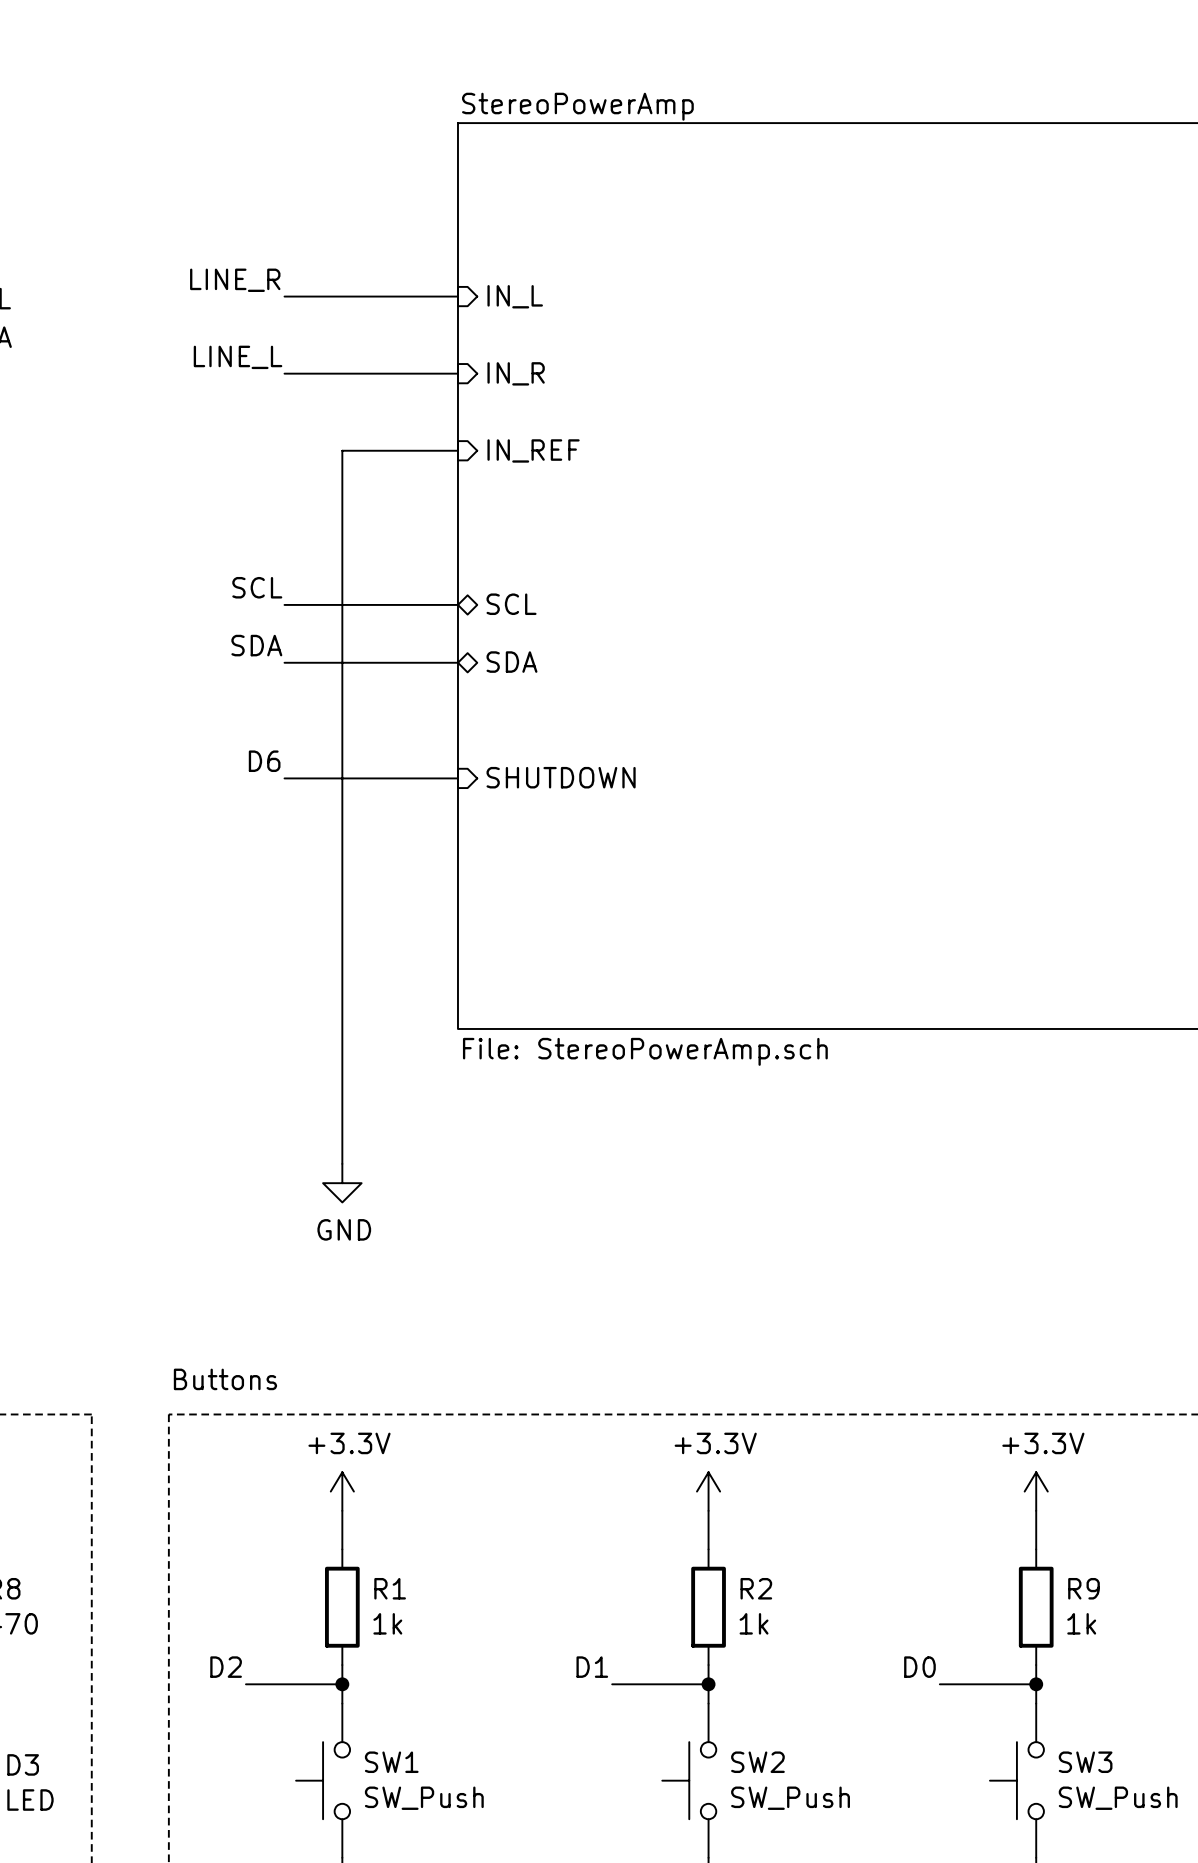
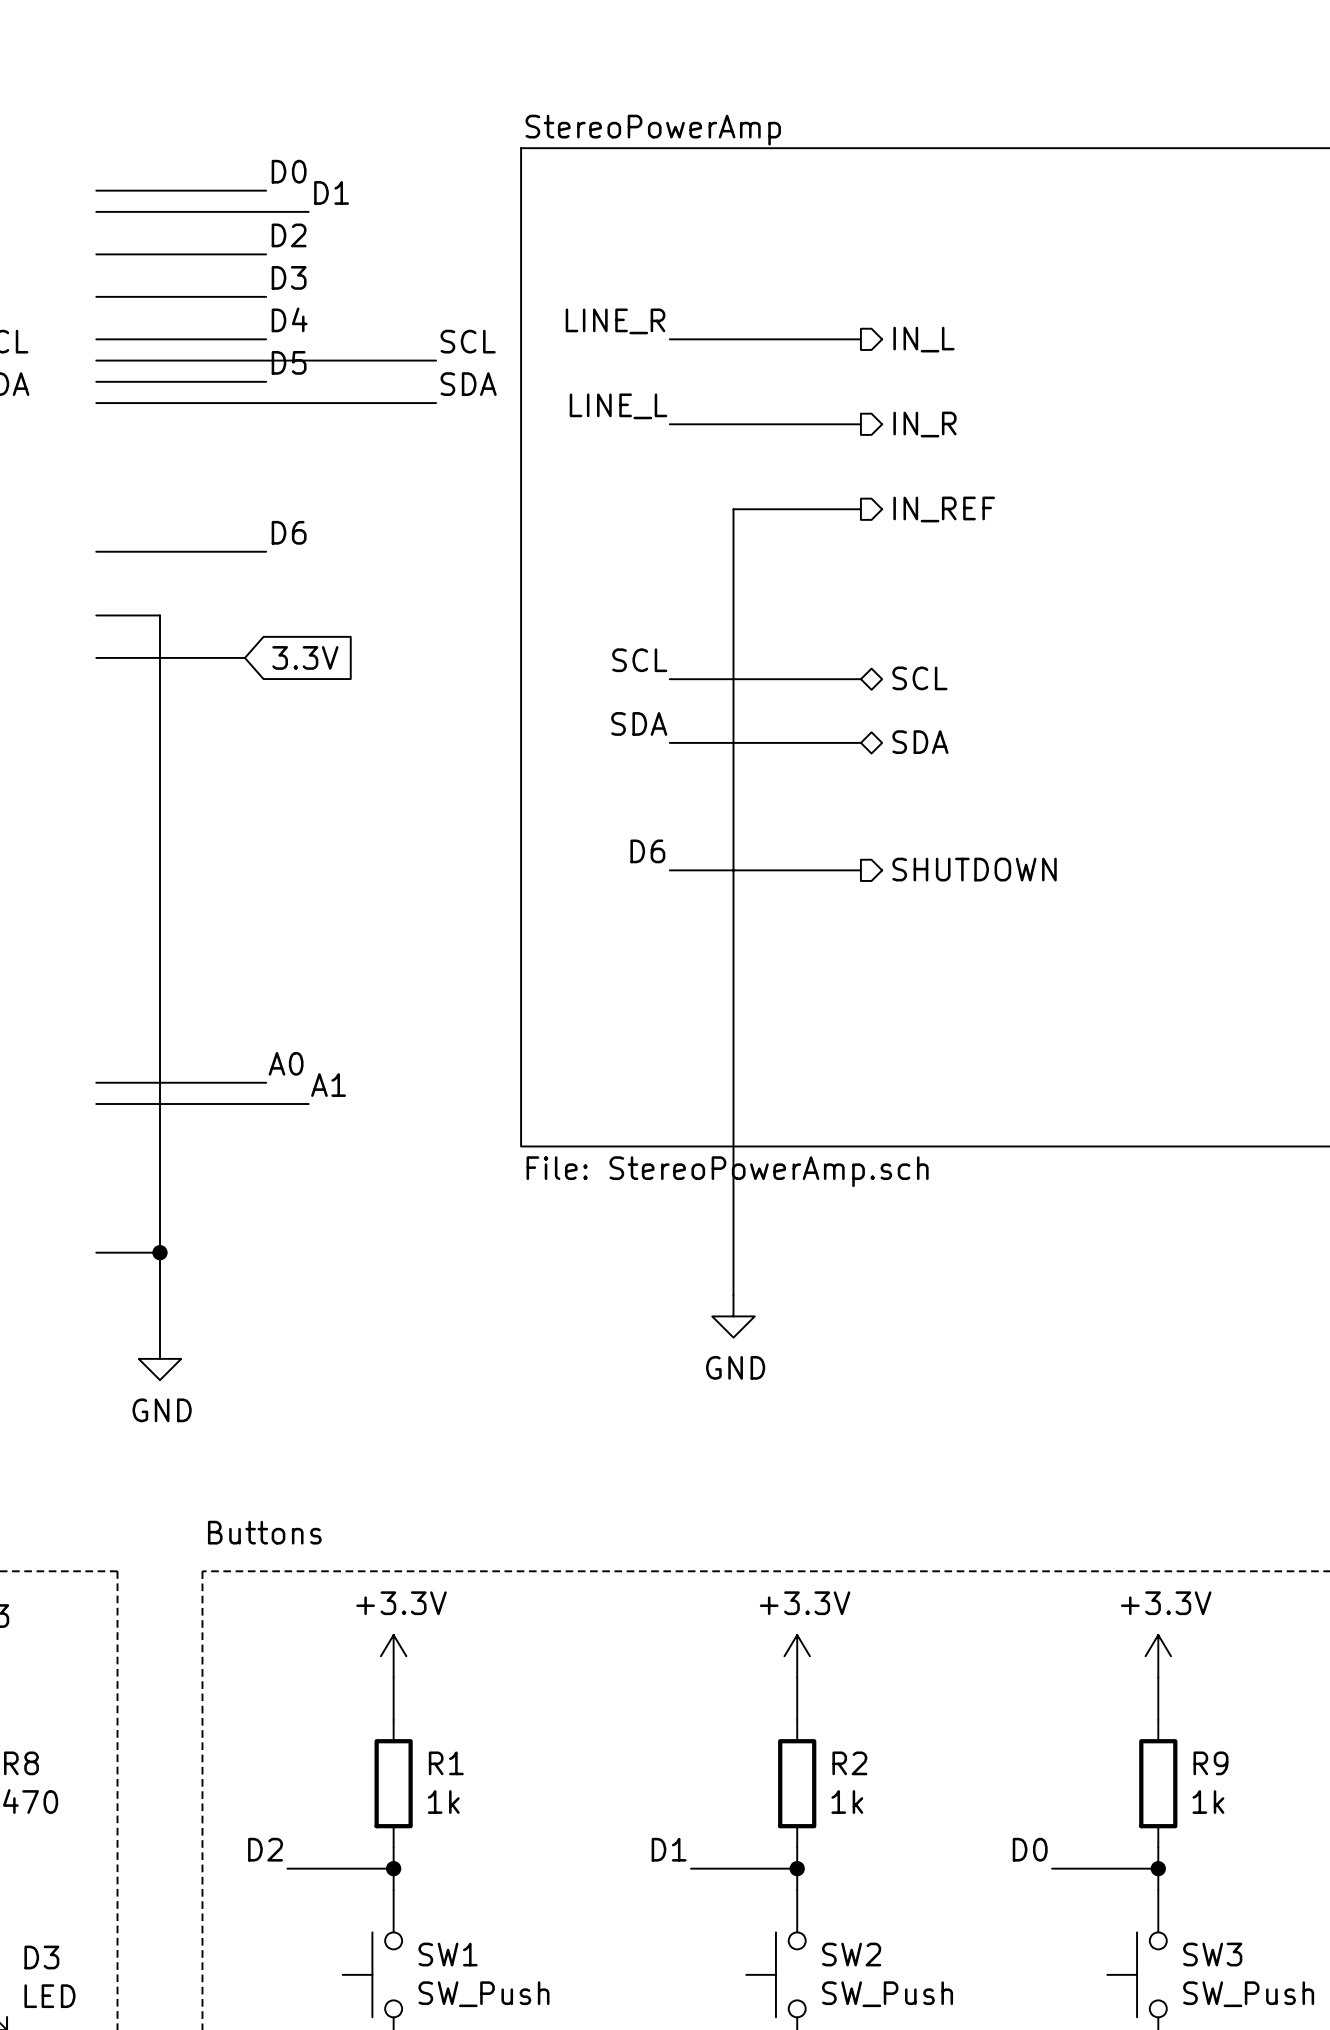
label: none -> D0 (289, 171)
wire: none -> (96, 190) (266, 190)
label: none -> D1 (331, 192)
wire: none -> (96, 211) (308, 211)
label: none -> D2 (289, 235)
wire: none -> (96, 254) (266, 254)
label: none -> D3 (289, 277)
wire: none -> (96, 296) (266, 296)
label: none -> D4 (289, 319)
label position: LINE_R (235, 280) -> LINE_R (615, 321)
wire: none -> (96, 339) (266, 339)
wire: (284, 296) (457, 296) -> (669, 339) (860, 339)
sheet pin position: IN_L (515, 296) -> IN_L (923, 339)
label: none -> SCL (468, 341)
wire: none -> (96, 360) (436, 360)
label: none -> D5 (289, 362)
wire: none -> (96, 381) (266, 381)
label: none -> SDA (468, 384)
wire: none -> (96, 403) (436, 403)
label position: LINE_L (238, 357) -> LINE_L (618, 406)
wire: (284, 373) (457, 373) -> (669, 424) (860, 424)
sheet pin position: IN_R (516, 373) -> IN_R (924, 424)
wire: (457, 450) (342, 450) (342, 1163) -> (860, 509) (733, 509) (733, 1295)
sheet pin position: IN_REF (533, 450) -> IN_REF (944, 509)
label: none -> D6 (289, 532)
wire: none -> (96, 551) (266, 551)
wire: none -> (96, 615) (159, 615) (159, 1337)
wire: none -> (96, 657) (244, 657)
global label: none -> 3.3V (305, 657)
label: SCL (257, 587) -> none
label: none -> SCL (639, 660)
wire: (284, 604) (457, 604) -> (669, 679) (860, 679)
sheet pin position: SCL (511, 604) -> SCL (919, 678)
label: SDA (256, 645) -> none
label: none -> SDA (639, 723)
wire: (284, 662) (457, 662) -> (669, 742) (860, 742)
sheet pin position: SDA (511, 662) -> SDA (920, 742)
label: D6 (264, 761) -> none
label: none -> D6 (647, 851)
sheet pin position: SHUTDOWN (561, 777) -> SHUTDOWN (974, 869)
wire: (284, 778) (457, 778) -> (669, 870) (860, 870)
label: none -> A0 (286, 1063)
wire: none -> (96, 1082) (266, 1082)
label: none -> A1 (328, 1085)
wire: none -> (96, 1104) (308, 1104)
wire: none -> (96, 1252) (159, 1252)
junction: none -> (159, 1252)
power symbol: GND (342, 1183) -> none
power symbol: none -> GND (733, 1316)
power symbol: none -> GND (159, 1358)

